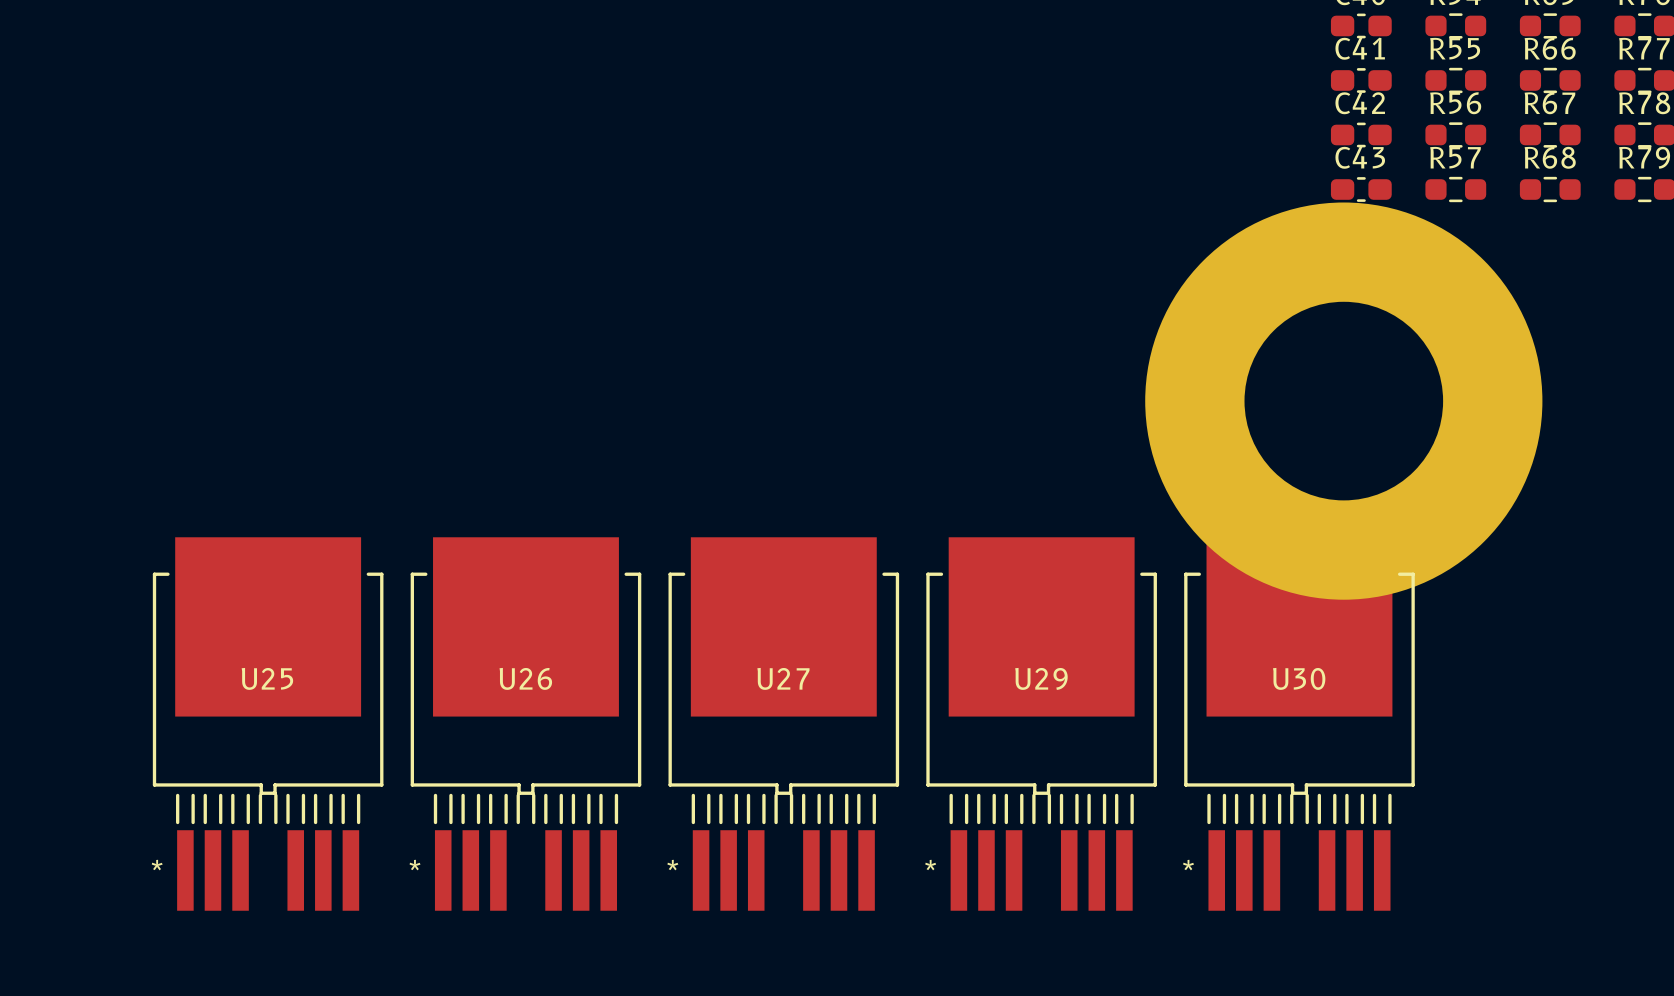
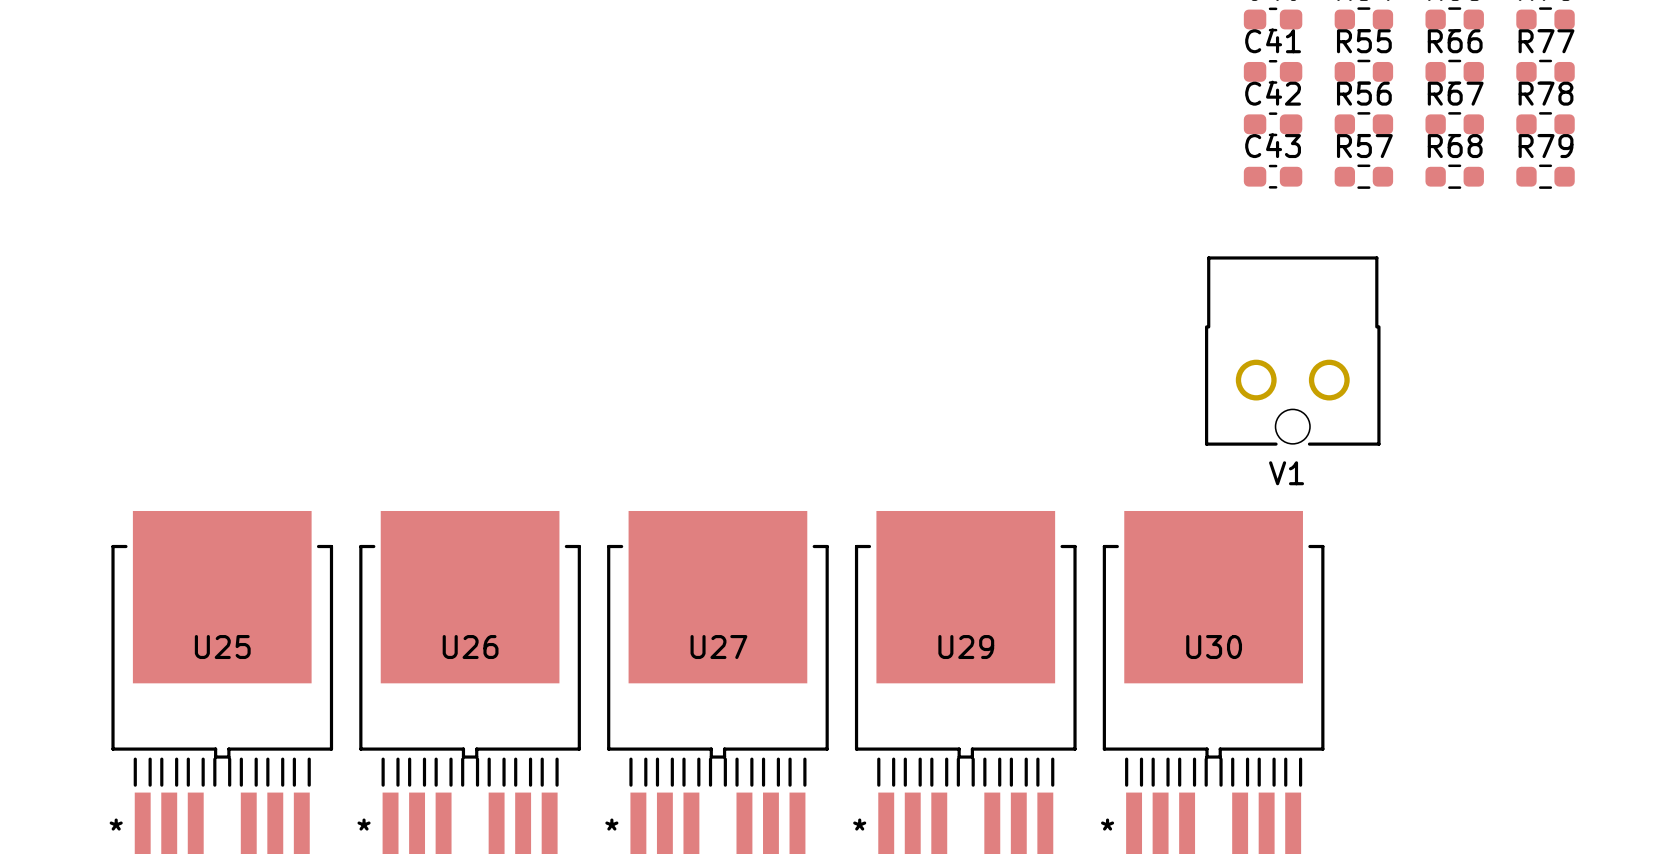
V1: none -> (1292, 351)
part: (1343, 401) -> none

